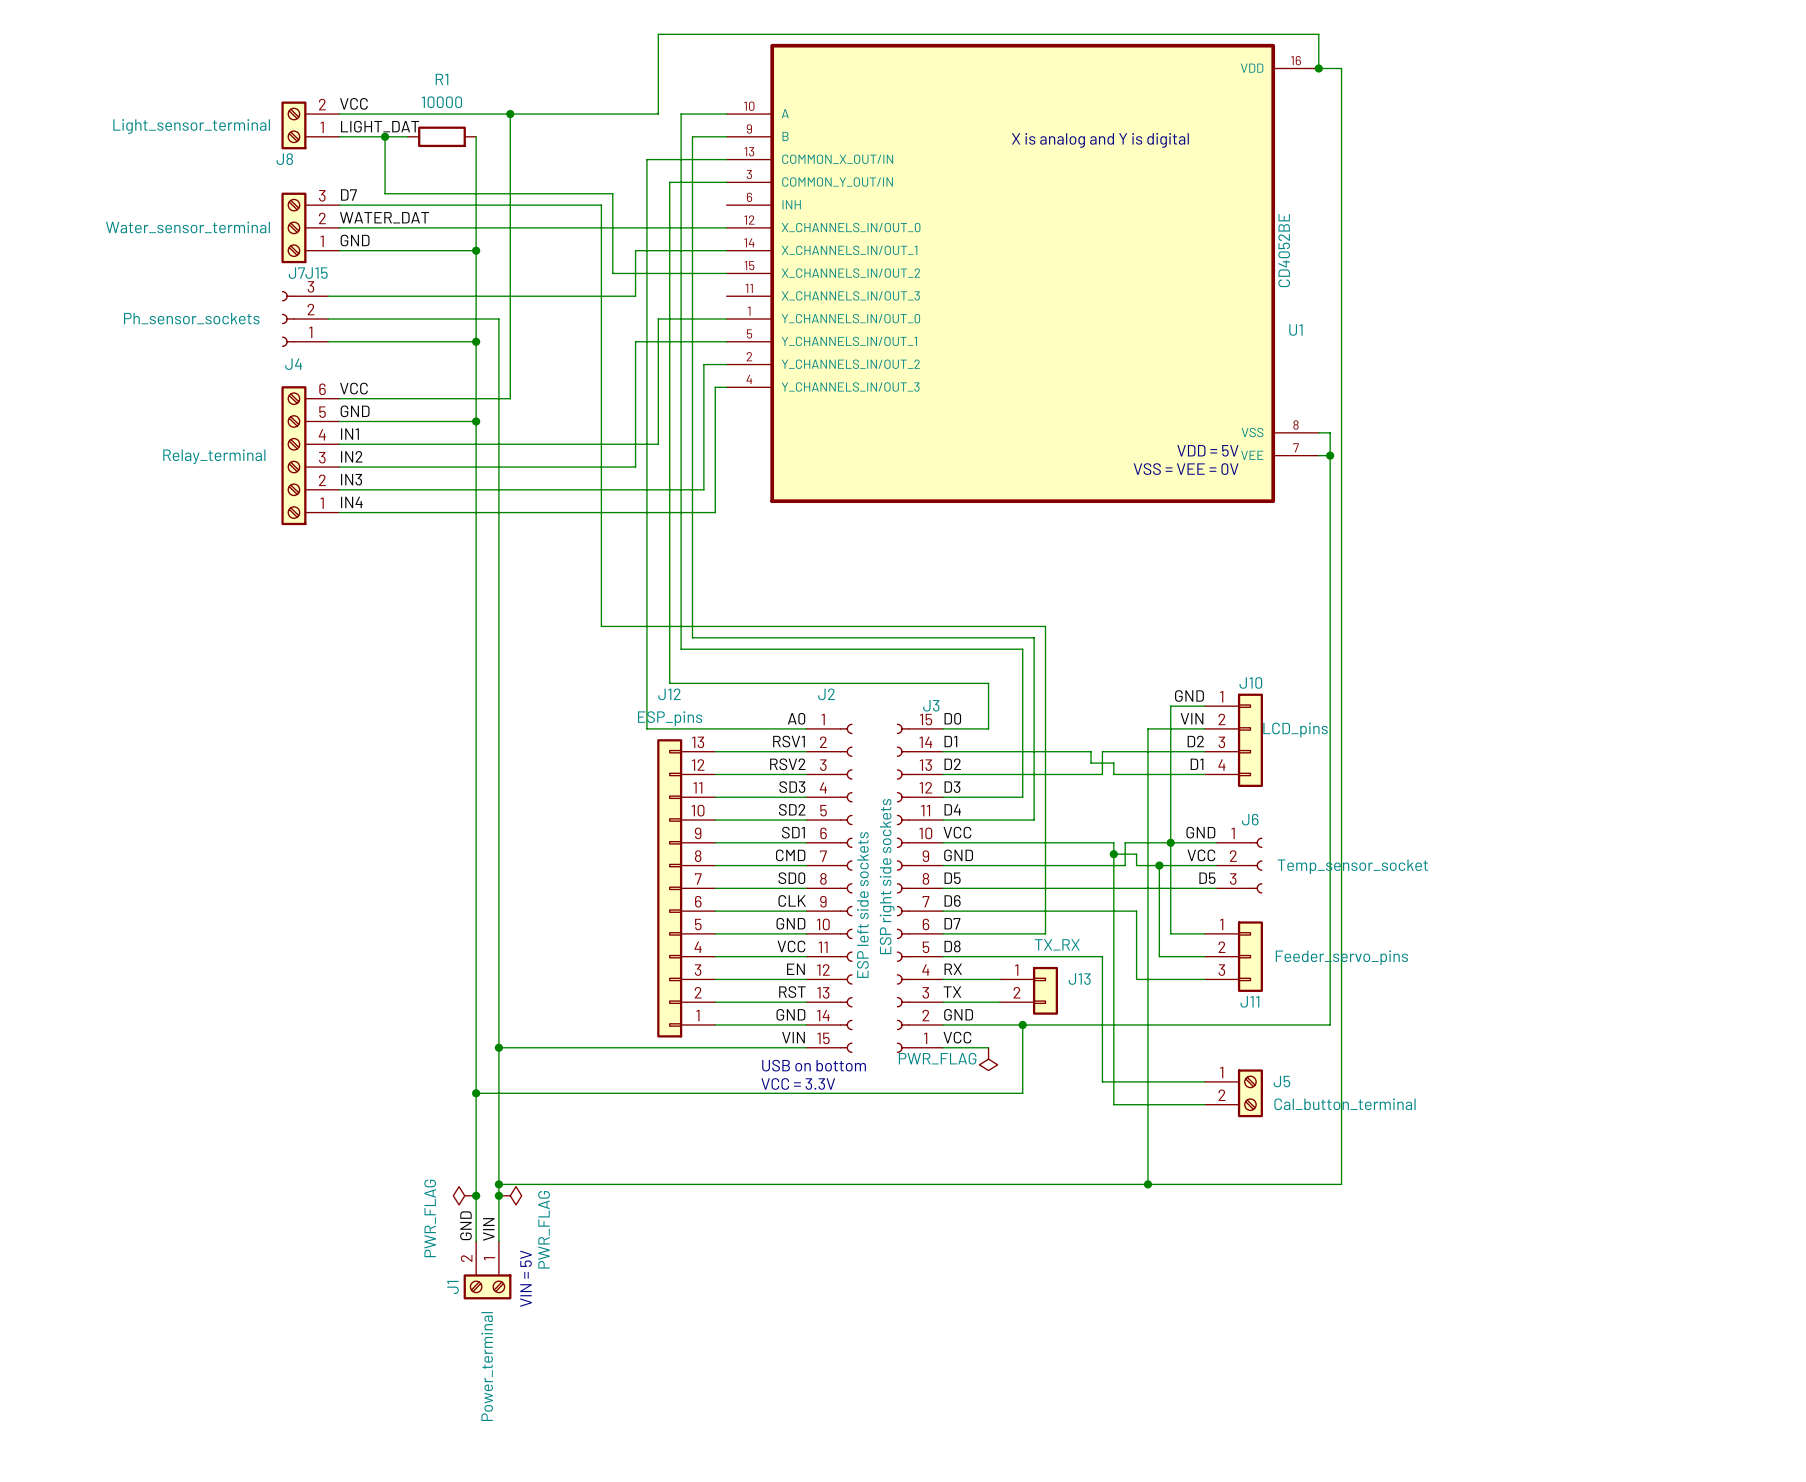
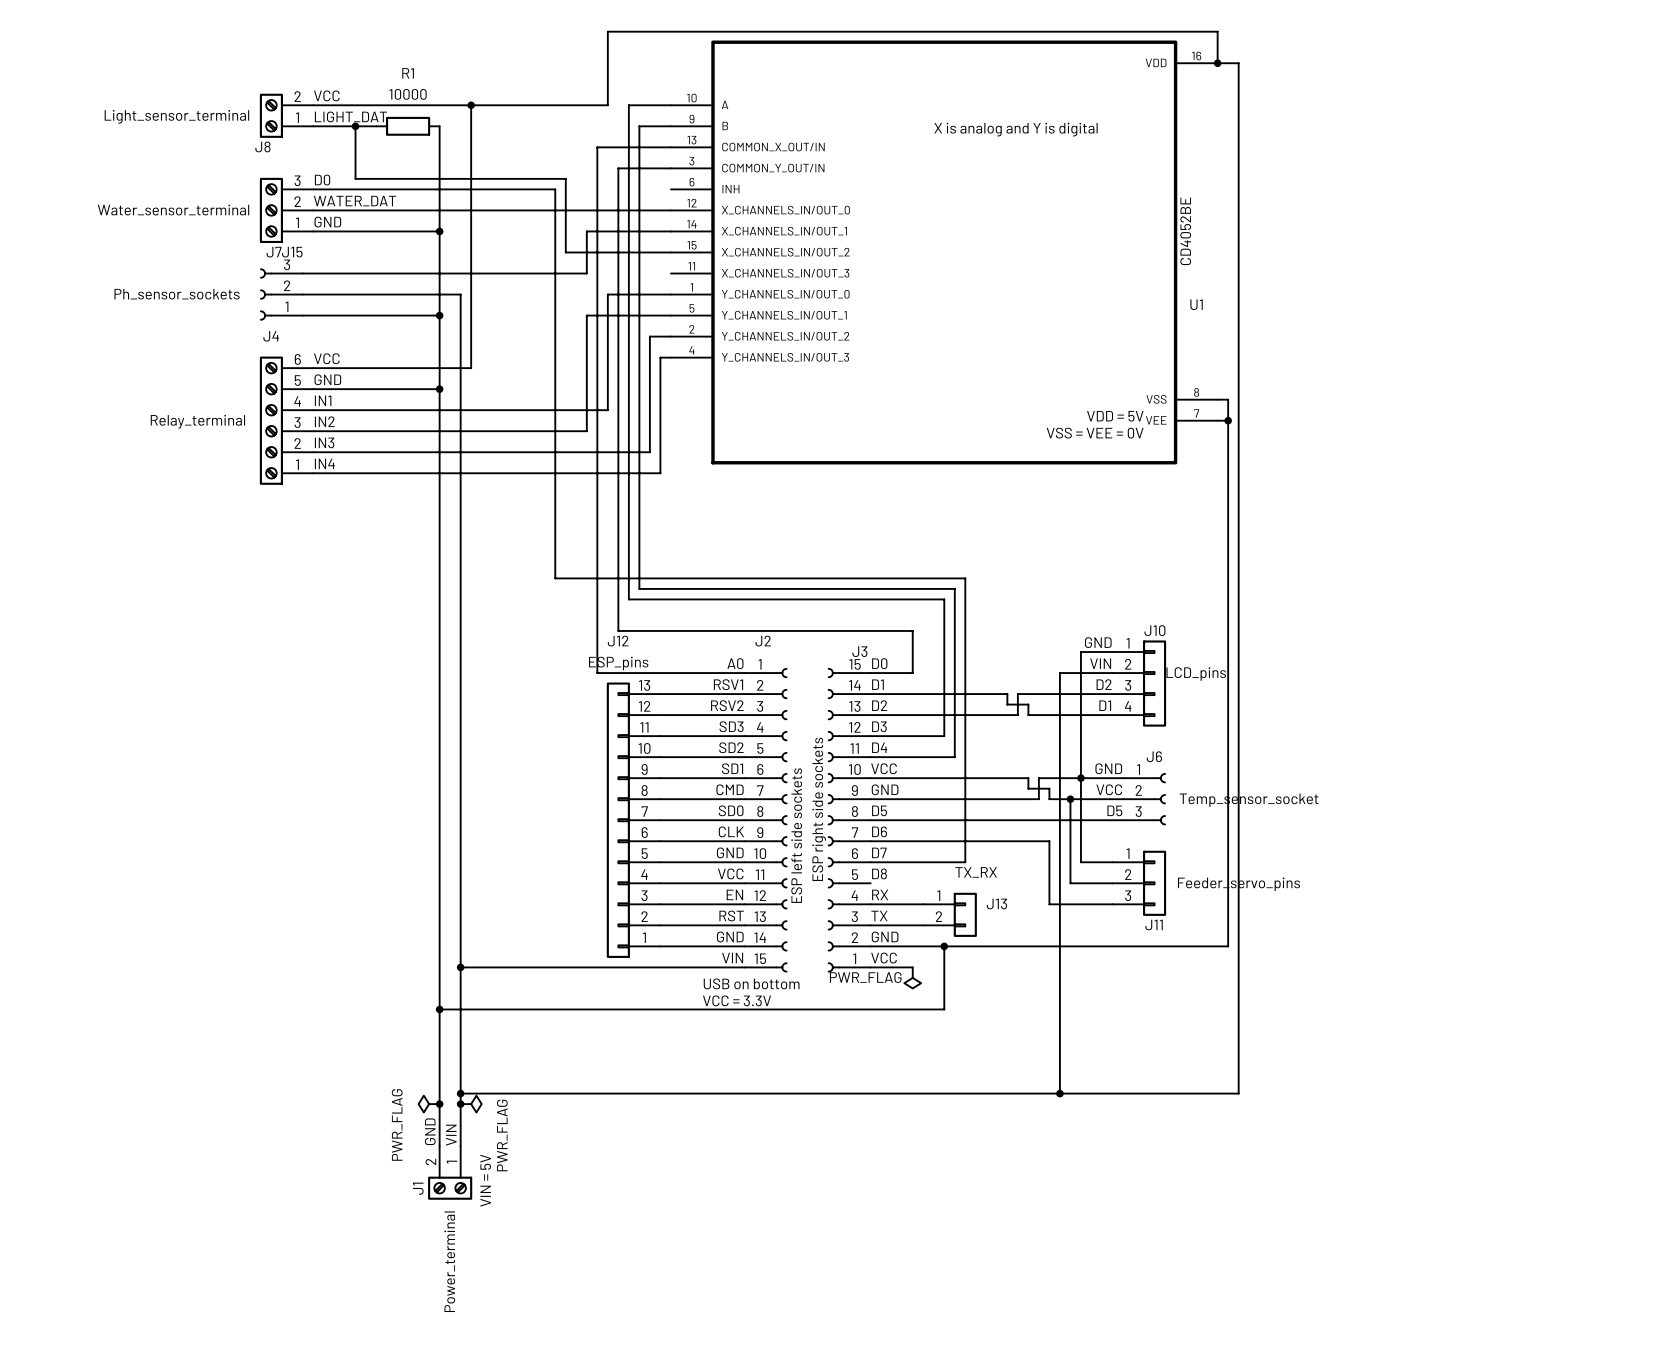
label: D7 (348, 194) -> D0 (322, 180)
wire: (1113, 854) (1113, 1104) (1204, 1104) -> none
junction: (1113, 854) -> none
wire: (943, 956) (1102, 956) (1102, 1081) (1204, 1081) -> none
J5: Cal_button_terminal (1233, 1093) -> none

